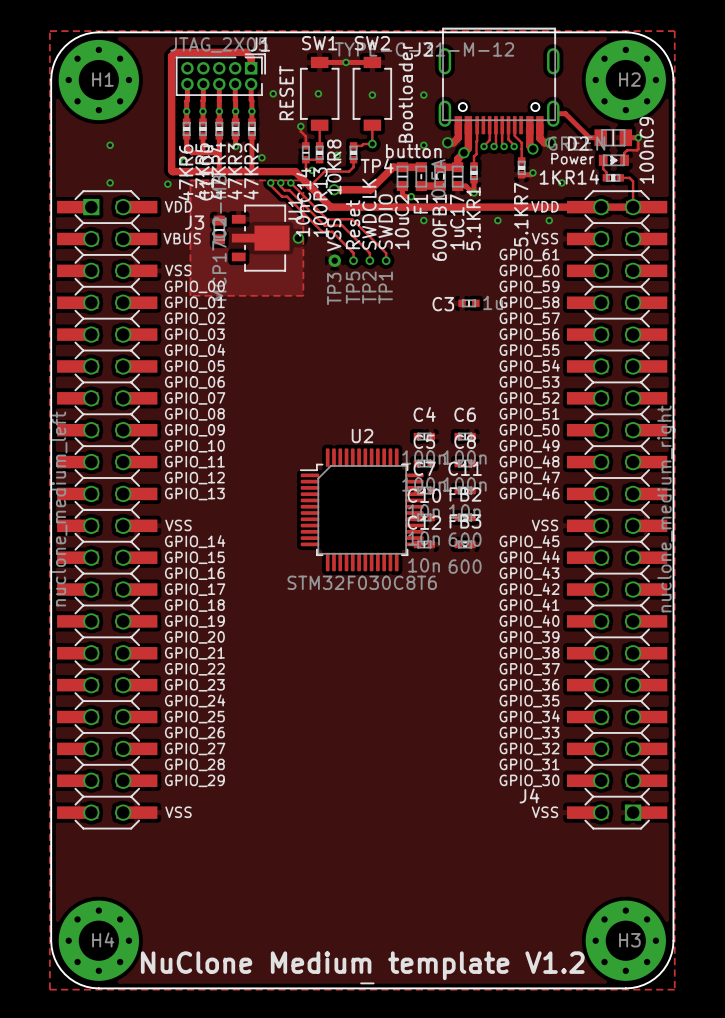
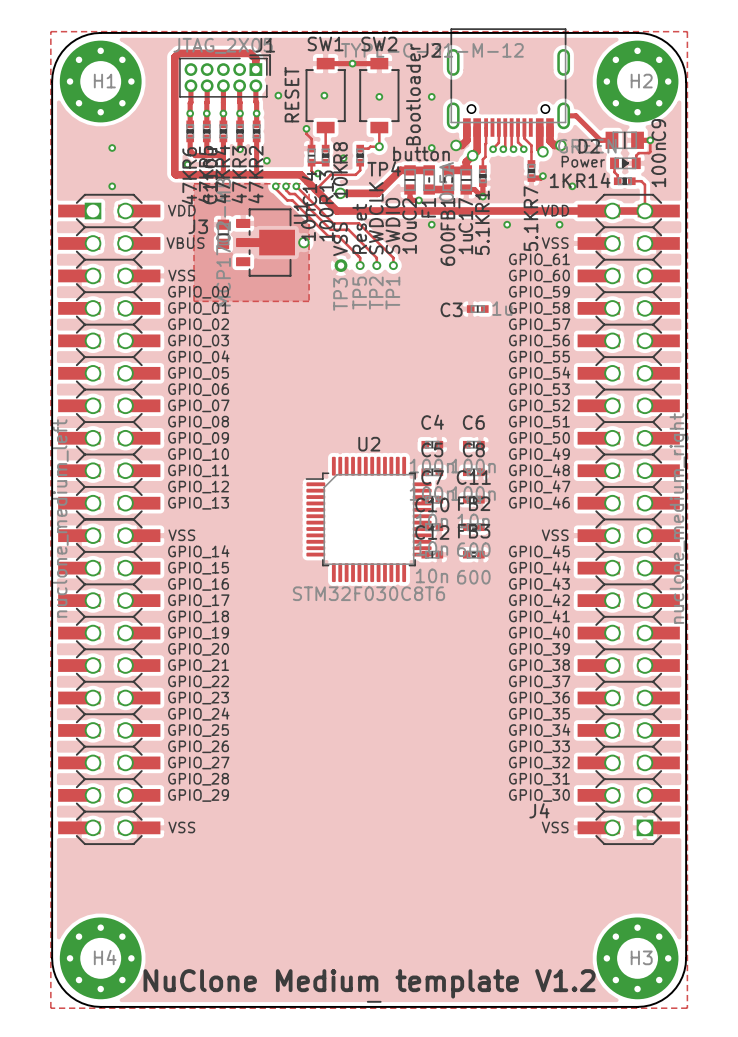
via: (167, 184) -> none

